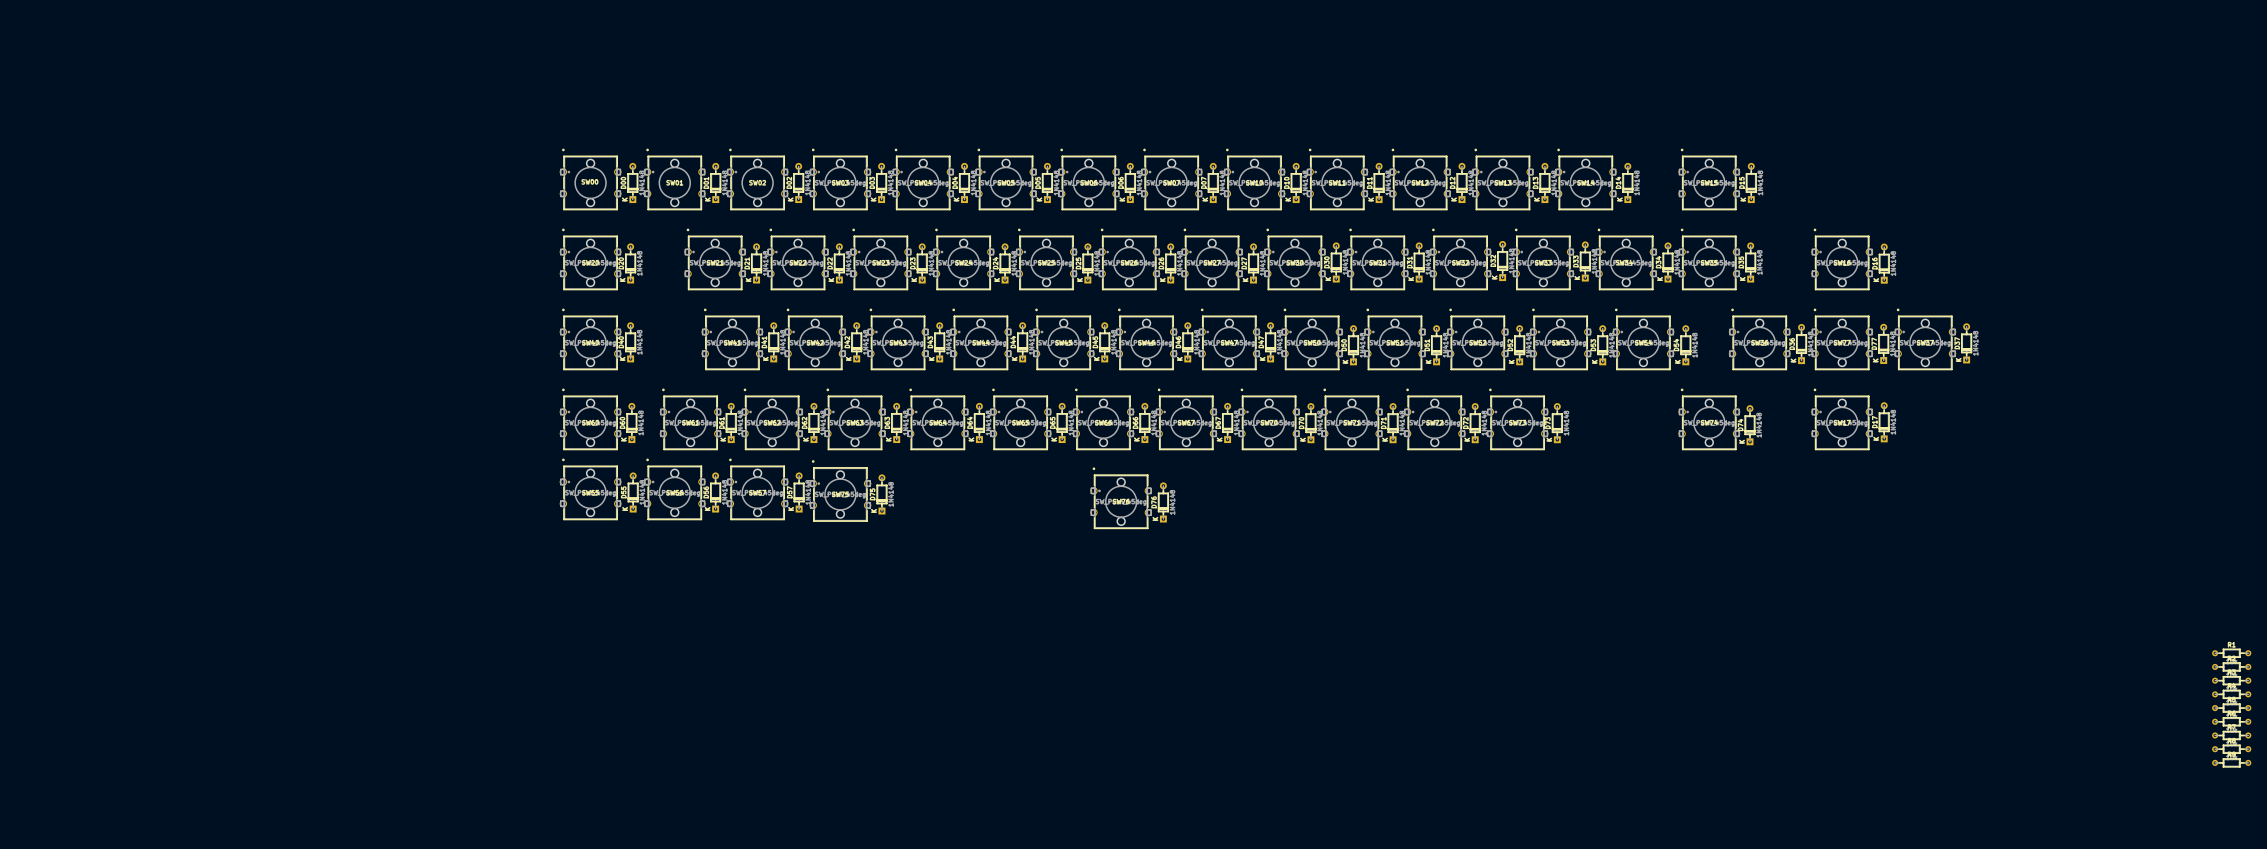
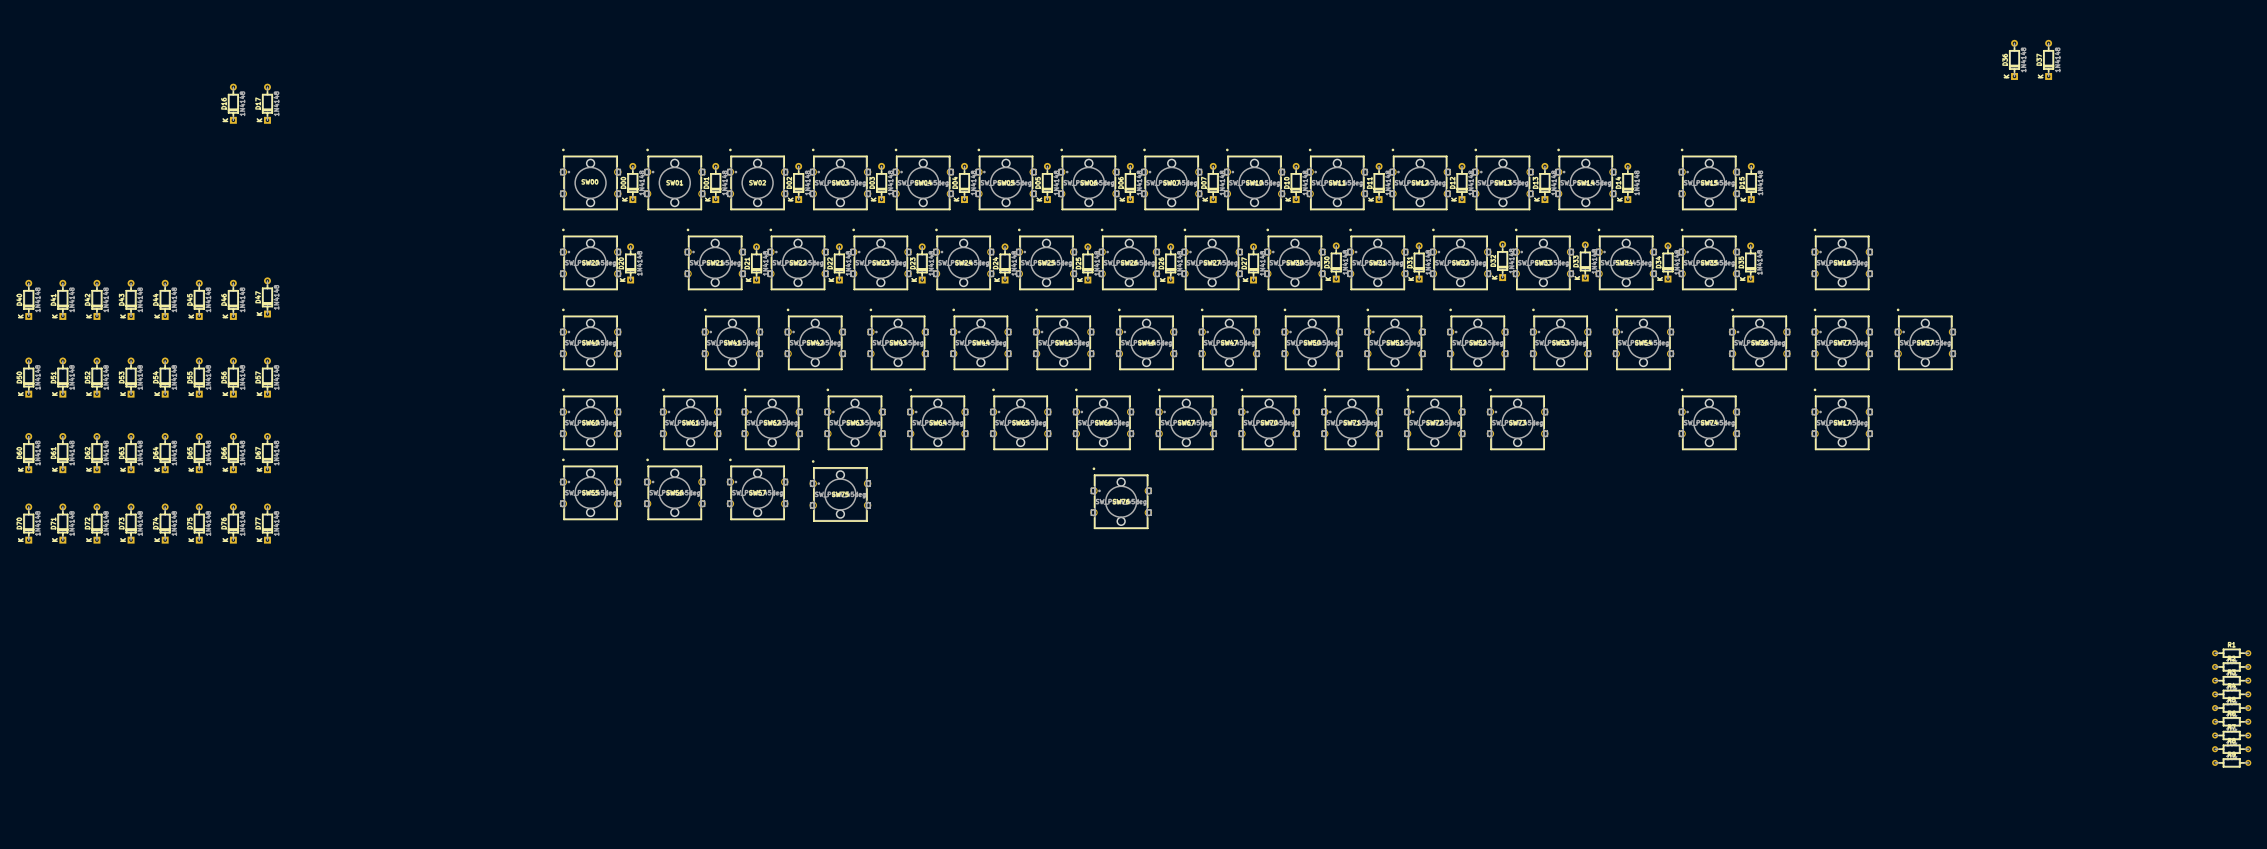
part position: (1884, 263) -> (233, 103)
part position: (630, 342) -> (28, 299)
part position: (773, 342) -> (62, 299)
part position: (856, 342) -> (96, 299)
part position: (939, 342) -> (131, 299)
part position: (1022, 342) -> (165, 299)
part position: (1104, 342) -> (199, 299)
part position: (1187, 342) -> (233, 299)
part position: (1270, 342) -> (267, 297)
part position: (1883, 343) -> (267, 523)
part position: (1966, 343) -> (2048, 59)
part position: (1801, 344) -> (2014, 59)
part position: (1353, 345) -> (28, 377)
part position: (1436, 345) -> (62, 377)
part position: (1519, 345) -> (96, 377)
part position: (1602, 345) -> (131, 377)
part position: (1685, 345) -> (165, 377)
part position: (631, 422) -> (28, 453)
part position: (731, 422) -> (62, 453)
part position: (813, 422) -> (96, 453)
part position: (896, 422) -> (131, 453)
part position: (979, 422) -> (165, 453)
part position: (1062, 422) -> (199, 453)
part position: (1144, 422) -> (233, 453)
part position: (1227, 422) -> (267, 453)
part position: (1884, 422) -> (267, 103)
part position: (1310, 423) -> (28, 523)
part position: (1393, 423) -> (62, 523)
part position: (1475, 423) -> (96, 523)
part position: (1557, 423) -> (131, 523)
part position: (1749, 425) -> (165, 523)
part position: (633, 492) -> (199, 377)
part position: (715, 492) -> (233, 377)
part position: (799, 492) -> (267, 377)
part position: (881, 494) -> (199, 523)
part position: (1163, 502) -> (233, 523)

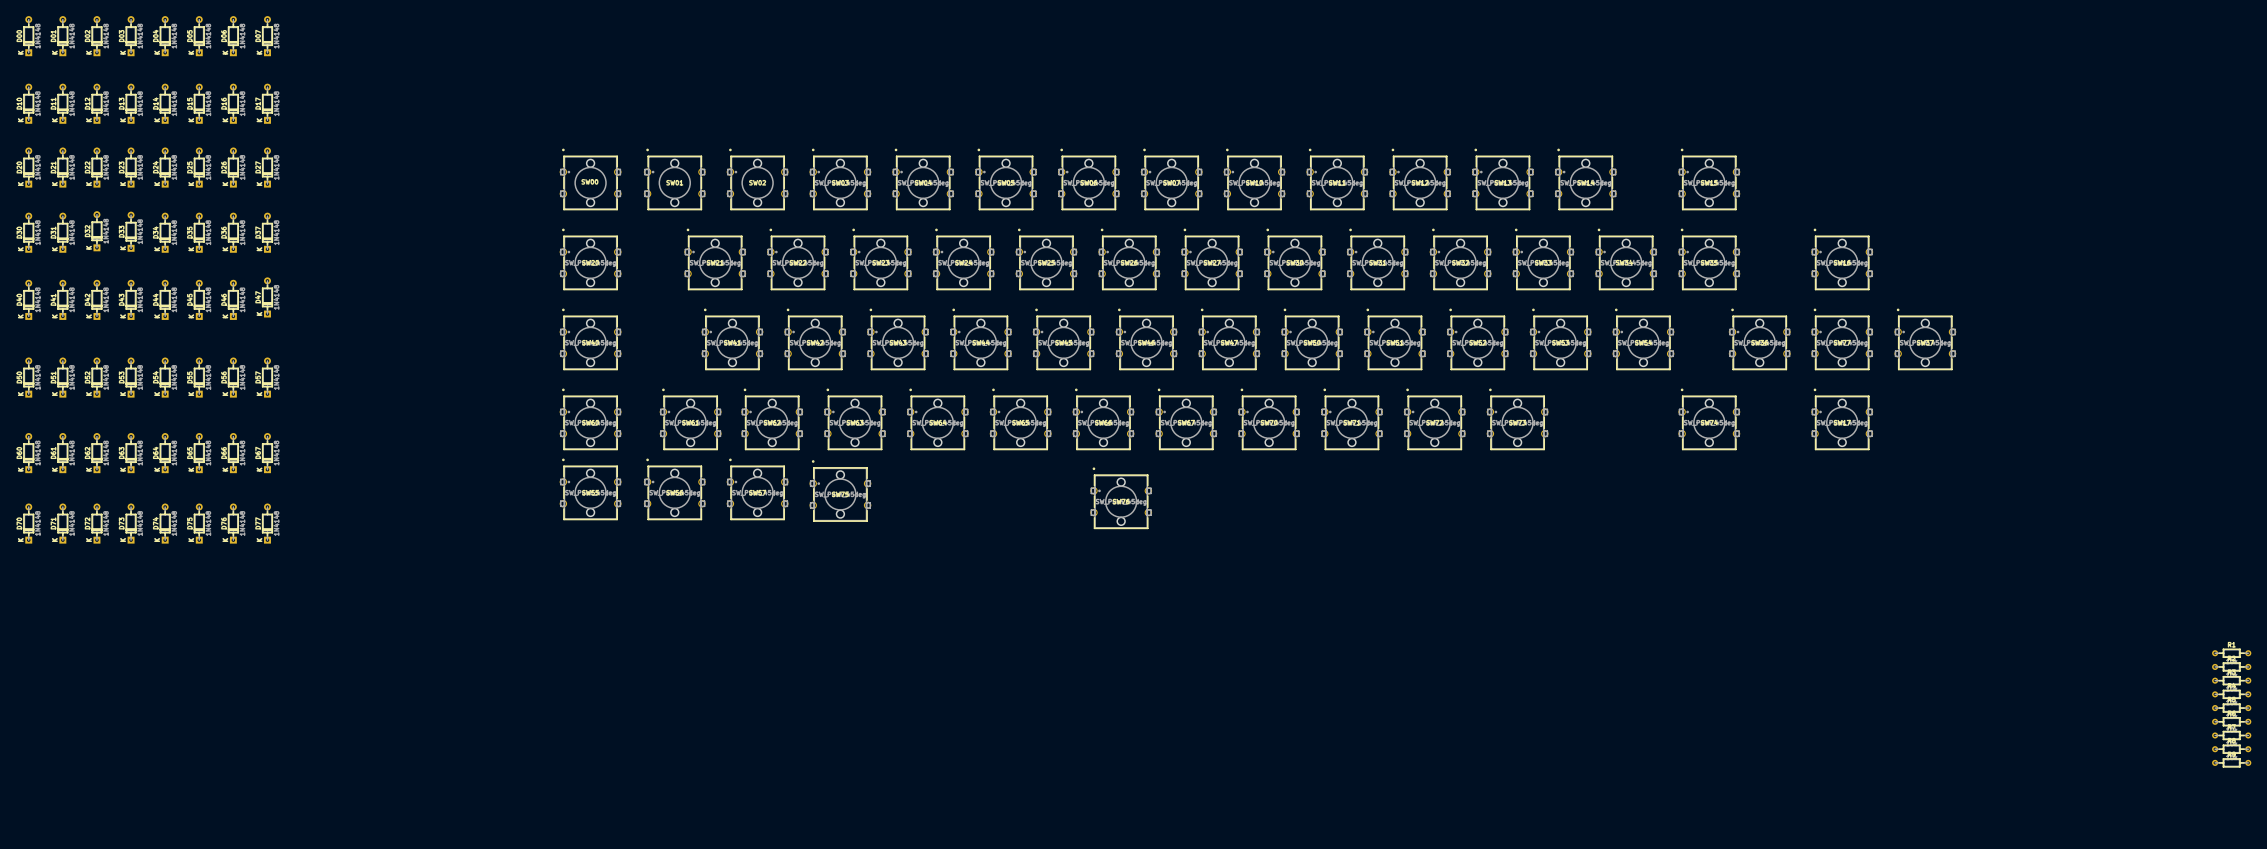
part position: (2014, 59) -> (233, 232)
part position: (2048, 59) -> (267, 232)
part position: (632, 182) -> (28, 36)
part position: (715, 182) -> (62, 36)
part position: (798, 182) -> (96, 36)
part position: (881, 182) -> (131, 36)
part position: (964, 182) -> (165, 36)
part position: (1047, 182) -> (199, 36)
part position: (1130, 182) -> (233, 36)
part position: (1213, 182) -> (267, 36)
part position: (1296, 182) -> (28, 103)
part position: (1379, 182) -> (62, 103)
part position: (1462, 182) -> (96, 103)
part position: (1544, 182) -> (131, 103)
part position: (1627, 182) -> (165, 103)
part position: (1751, 182) -> (199, 103)
part position: (1502, 261) -> (96, 231)
part position: (1585, 261) -> (131, 231)
part position: (1336, 262) -> (28, 232)
part position: (1419, 262) -> (62, 232)
part position: (1667, 262) -> (165, 232)
part position: (1750, 262) -> (199, 232)
part position: (630, 263) -> (28, 167)
part position: (756, 263) -> (62, 167)
part position: (839, 263) -> (96, 167)
part position: (922, 263) -> (131, 167)
part position: (1005, 263) -> (165, 167)
part position: (1087, 263) -> (199, 167)
part position: (1170, 263) -> (233, 167)
part position: (1253, 263) -> (267, 167)

